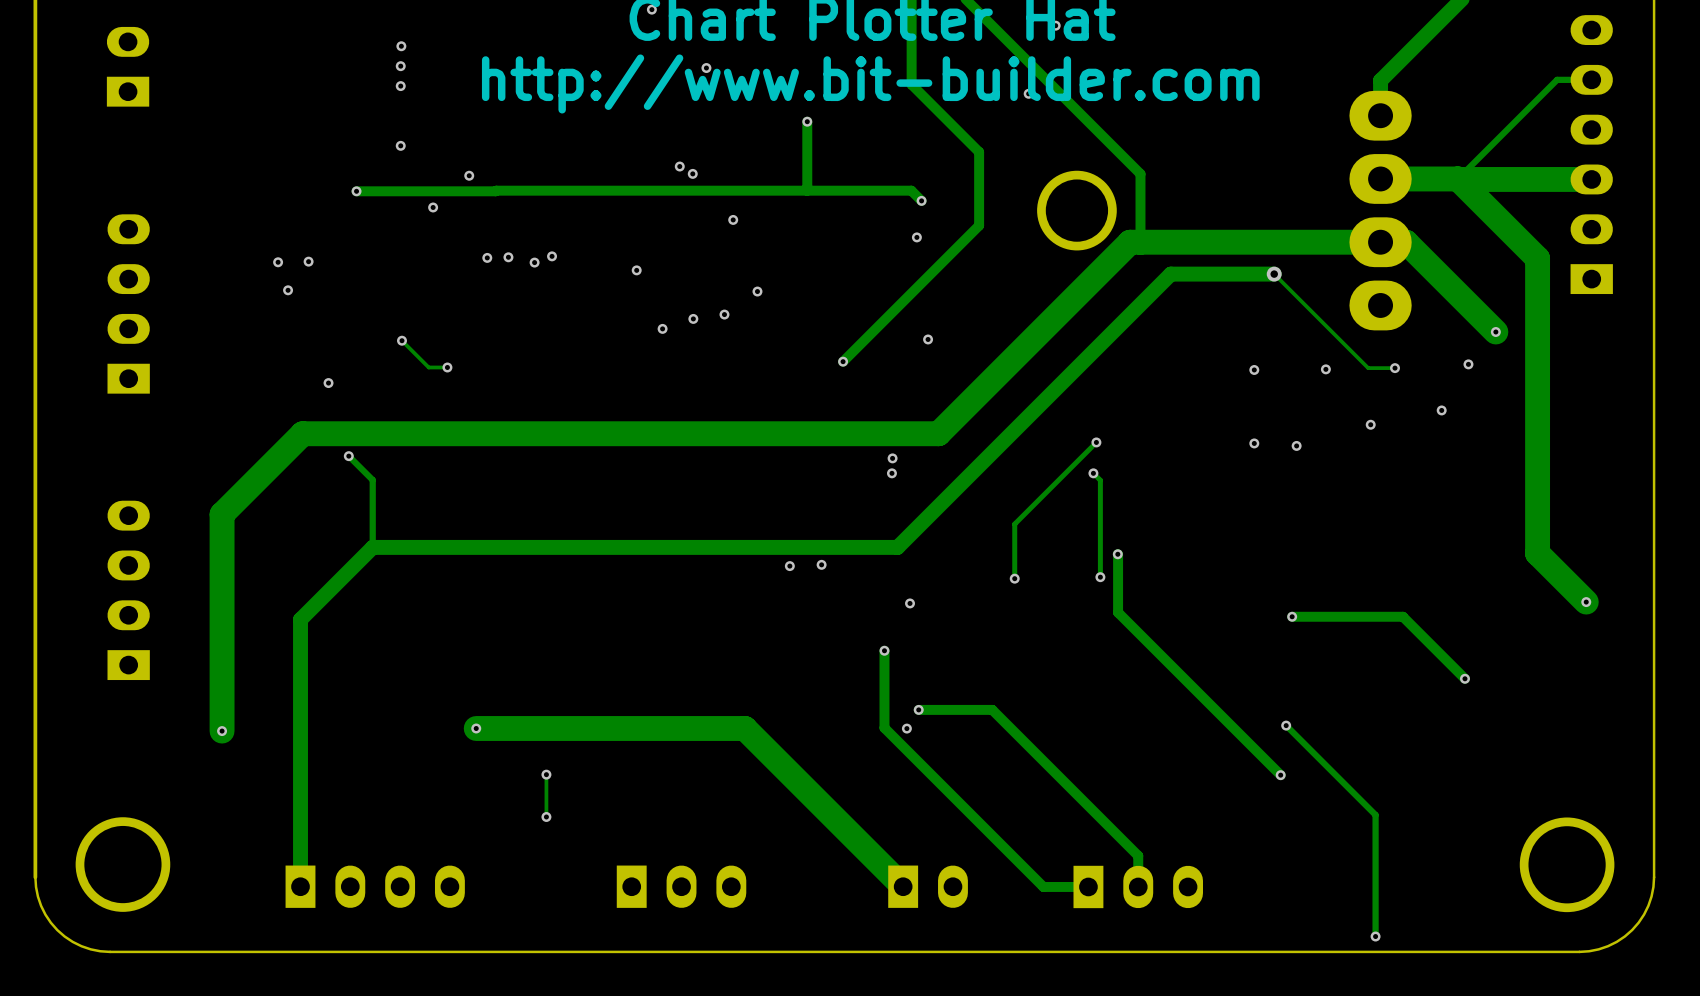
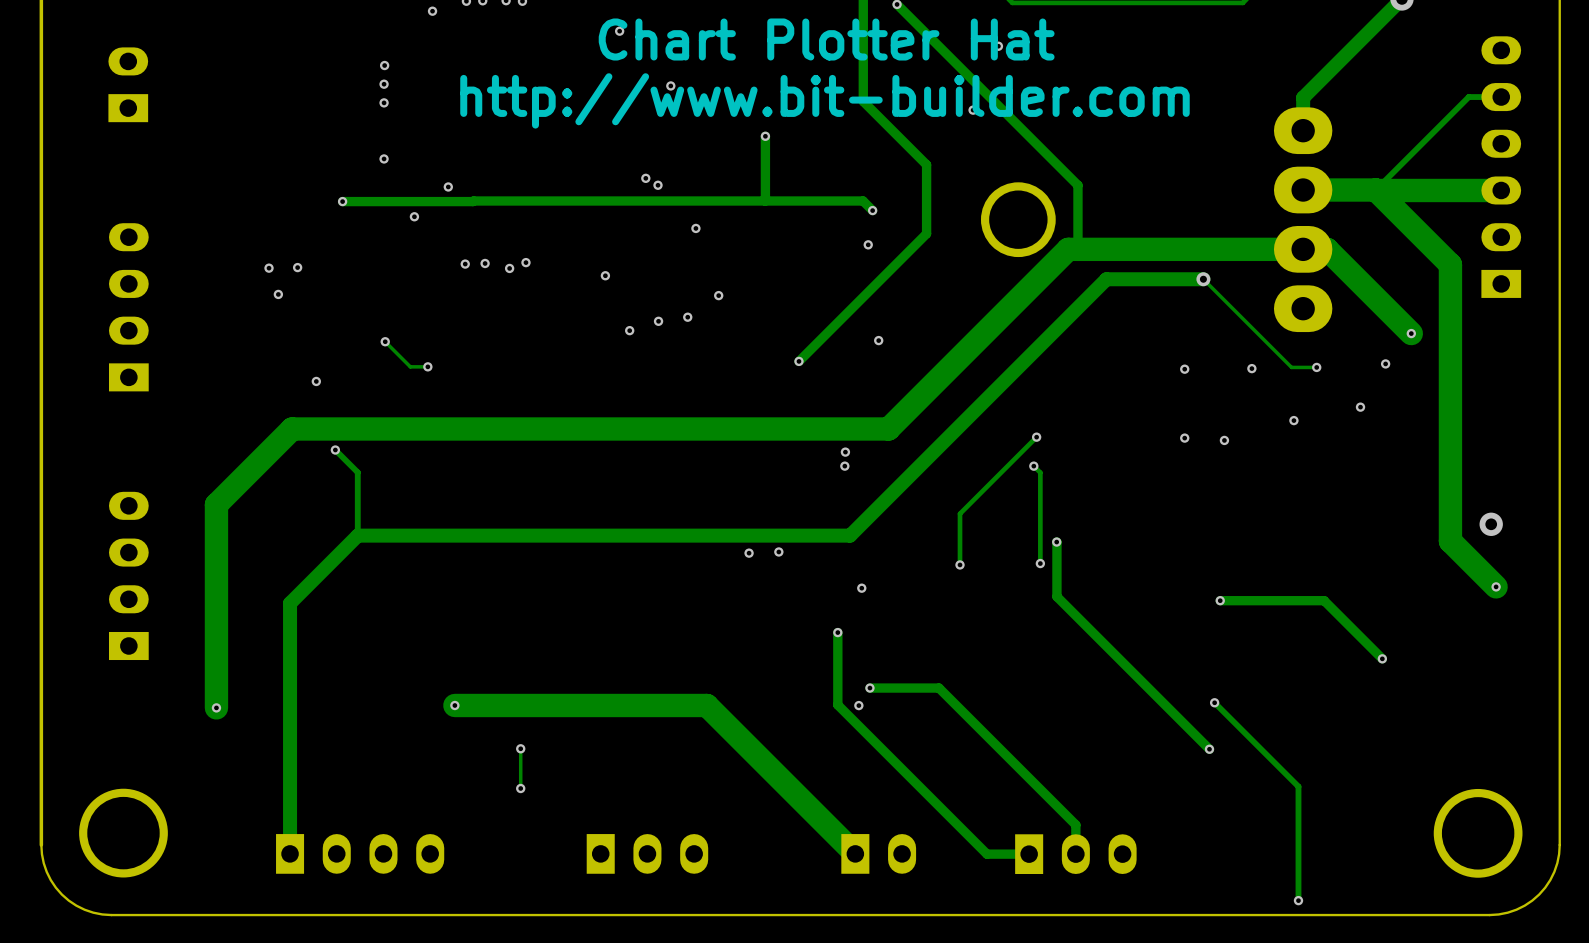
via: none -> (1491, 524)

